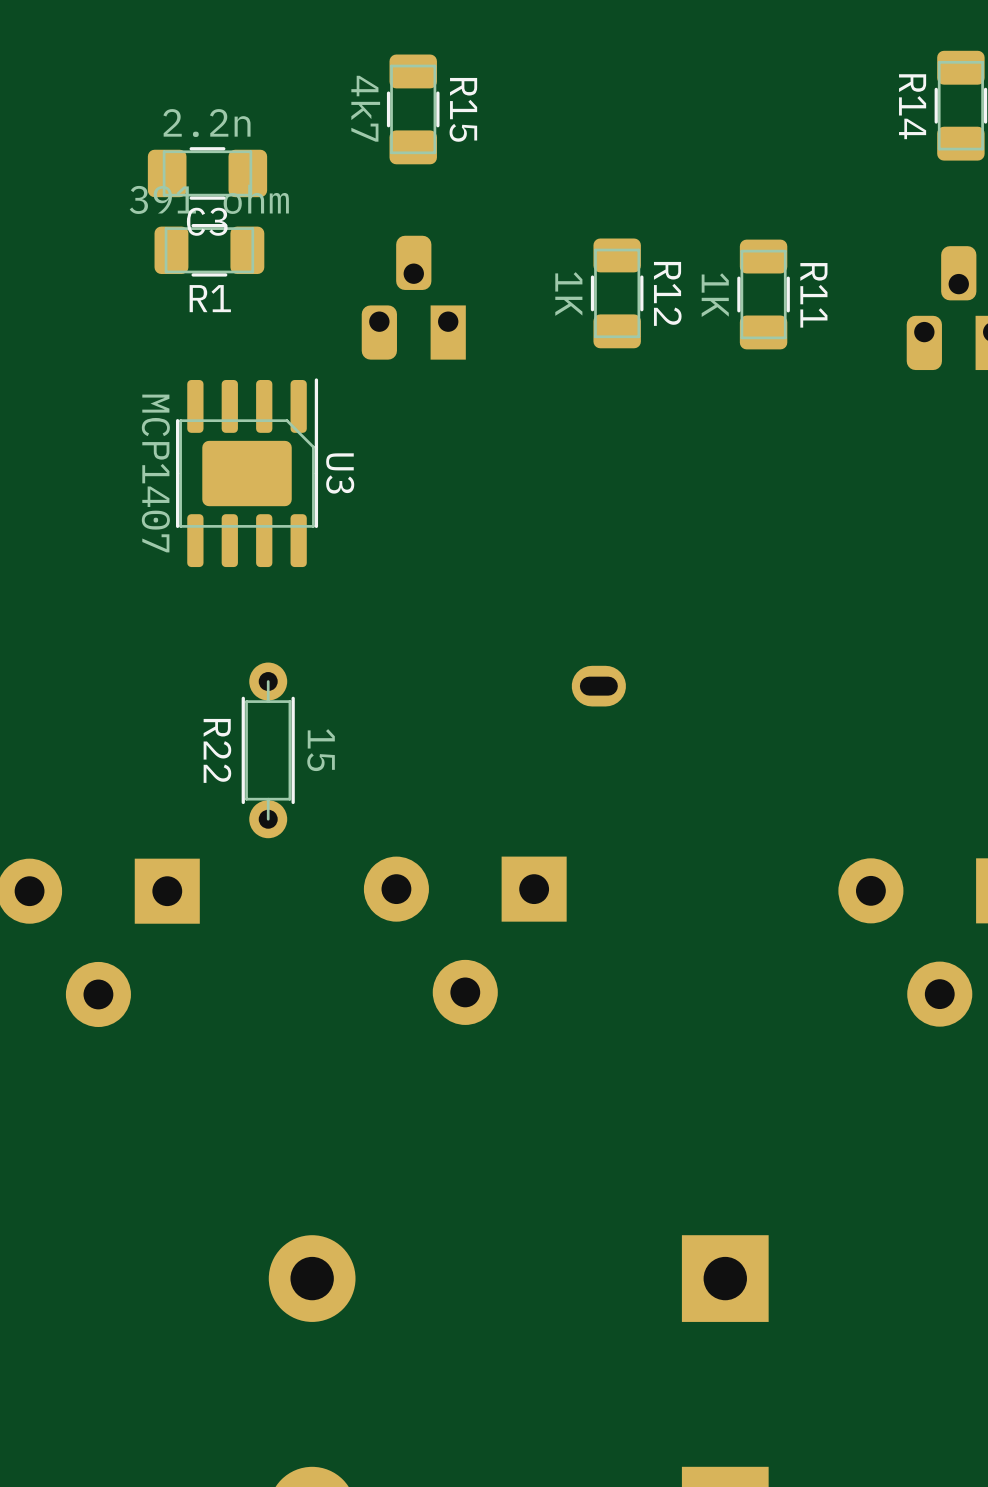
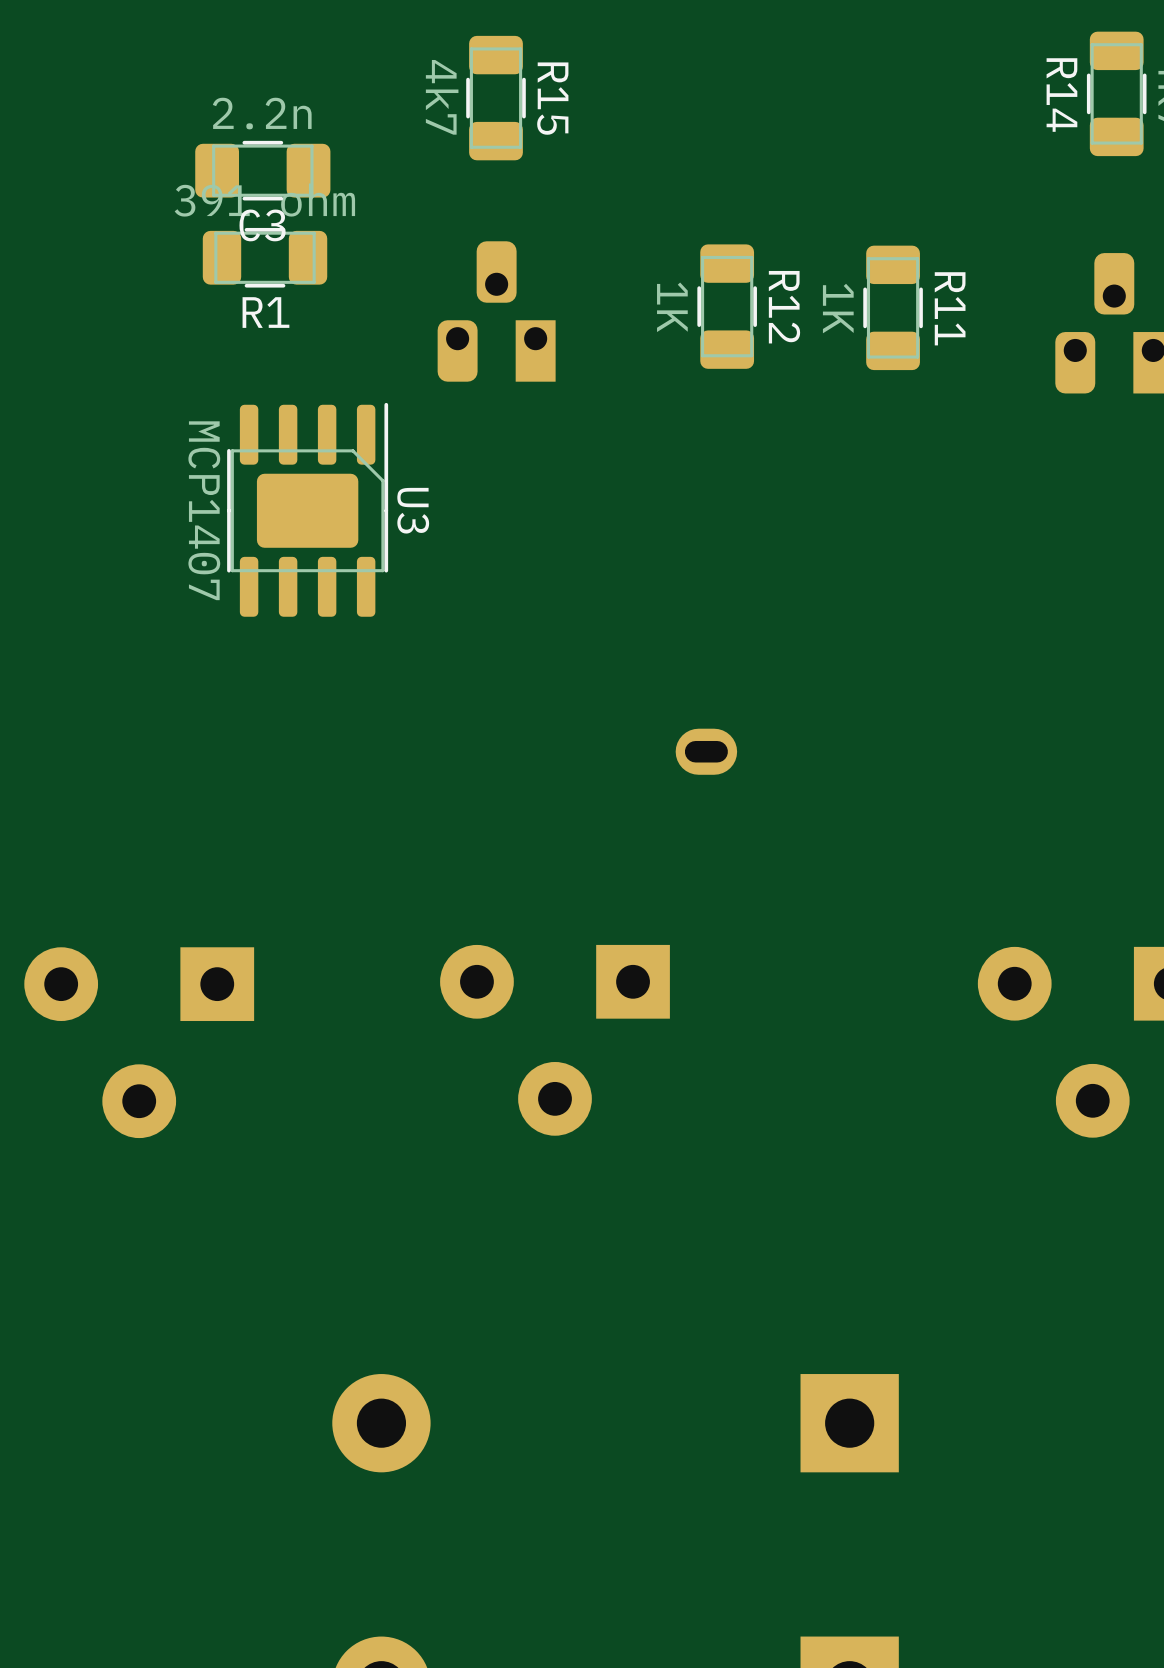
R22: 15 (268, 750) -> none

